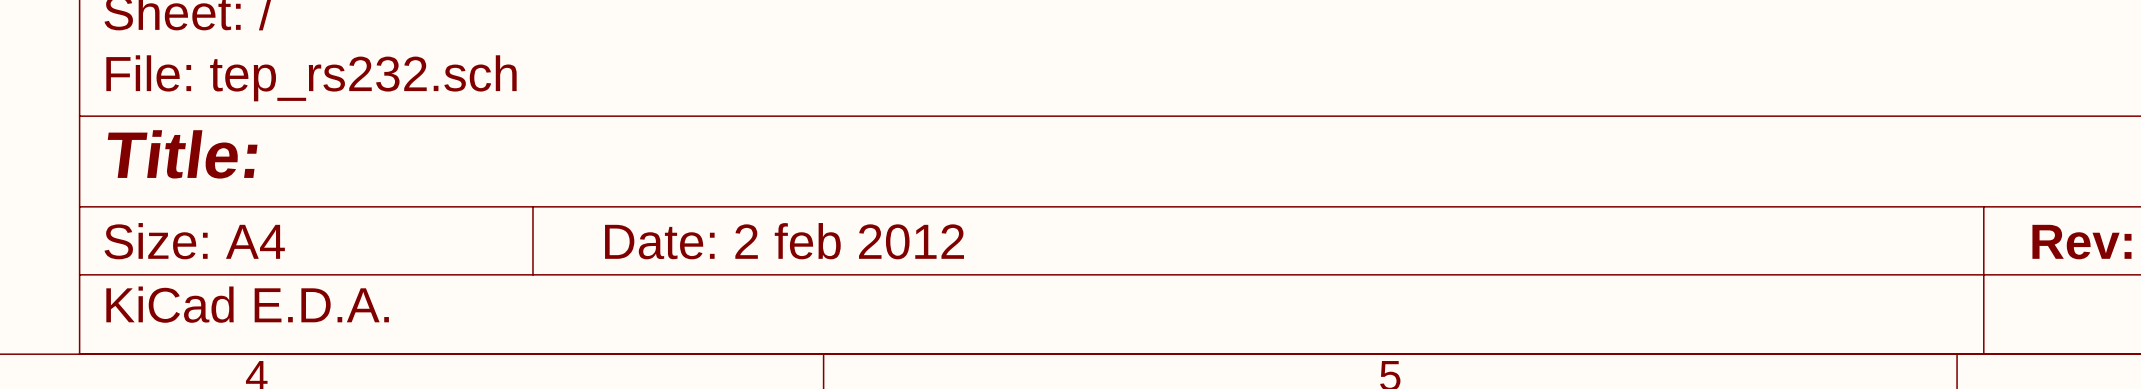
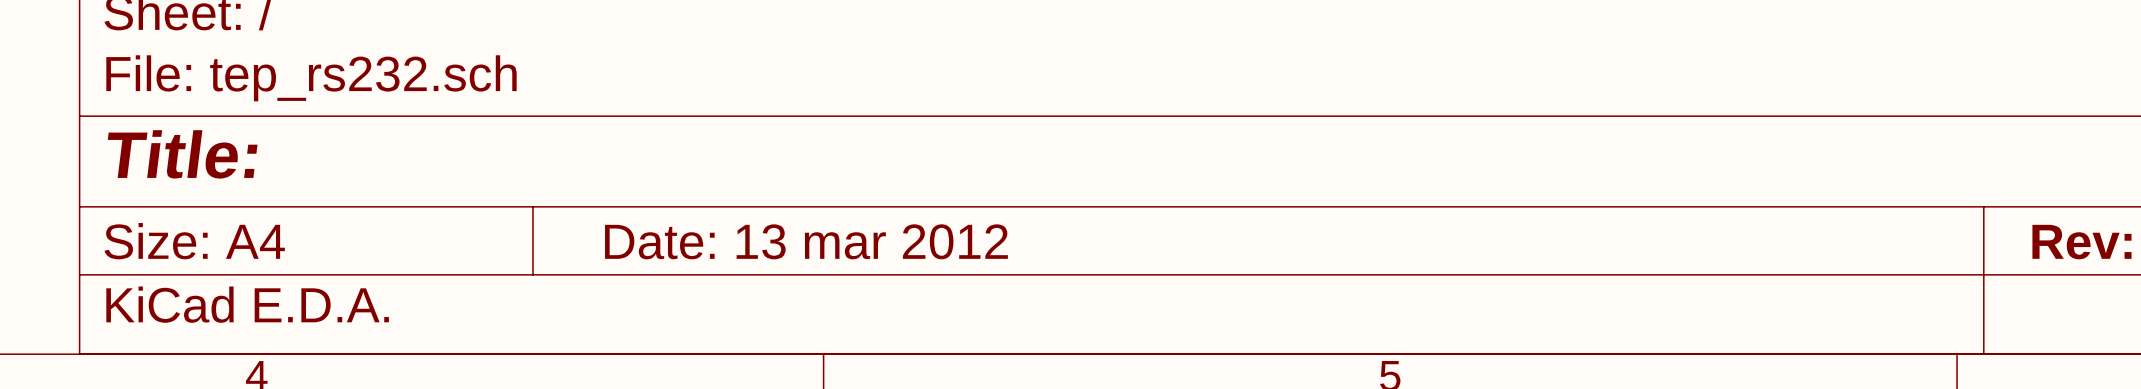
title block: Date: 2 feb 2012 (784, 241) -> Date: 13 mar 2012 (806, 241)

